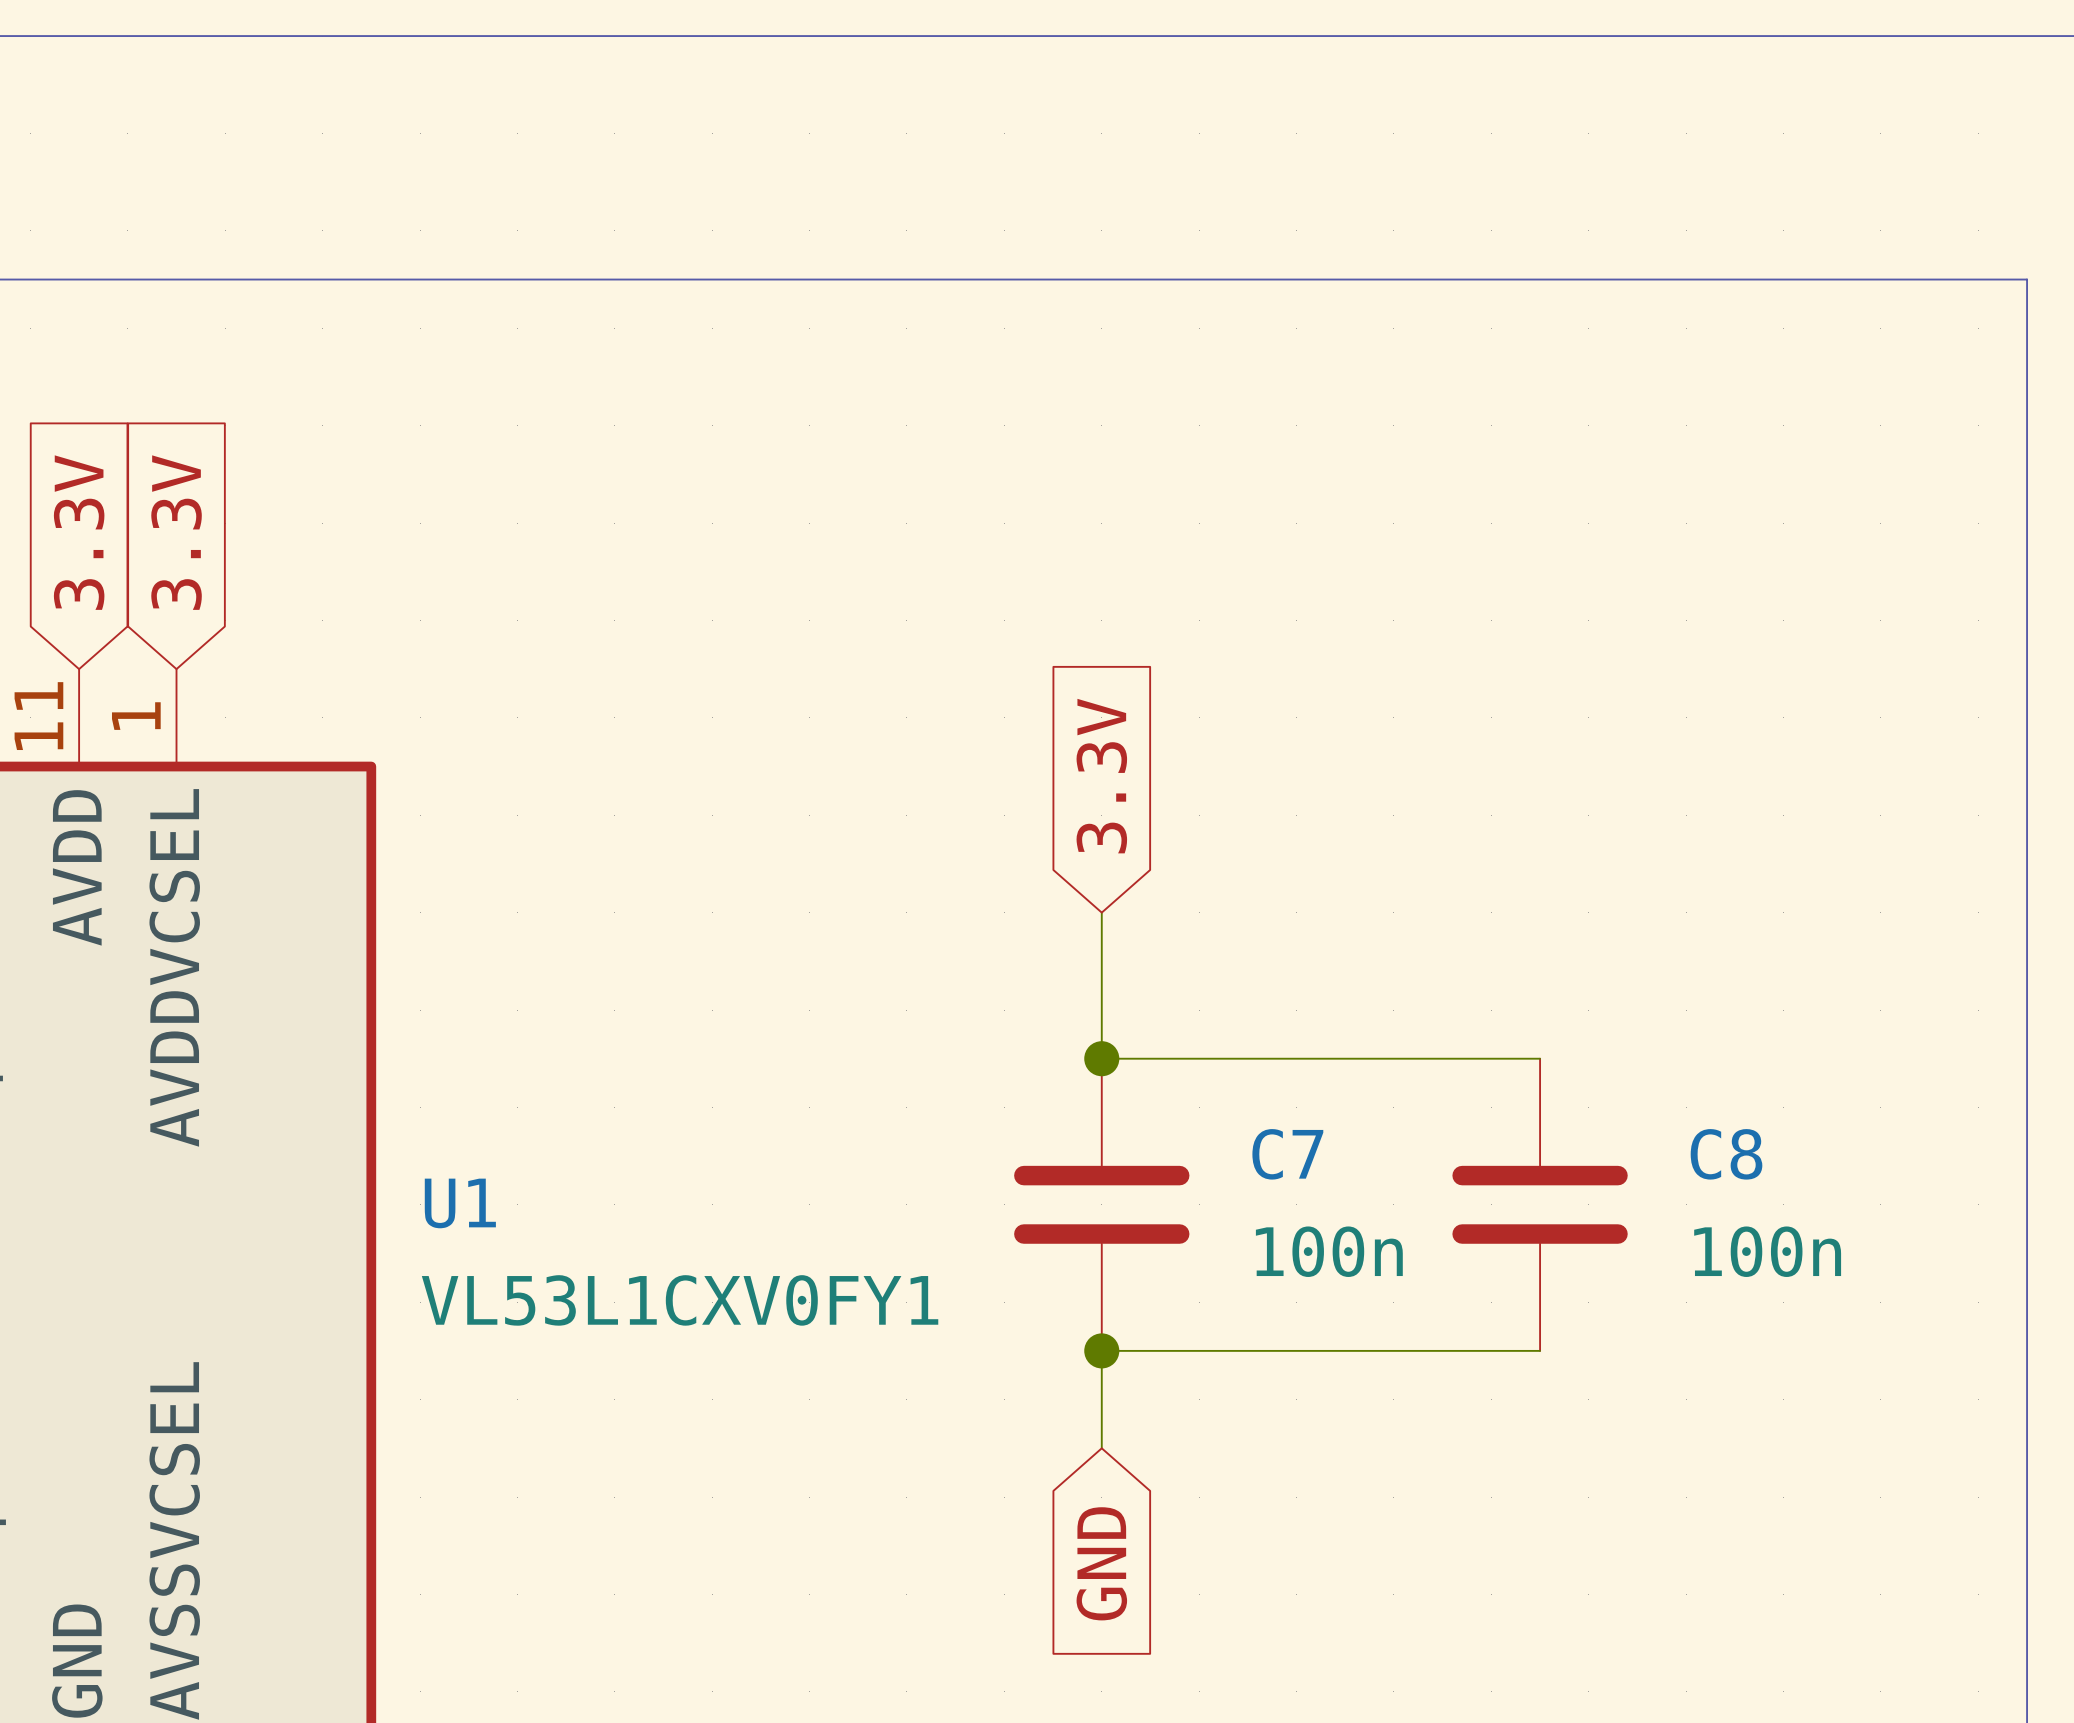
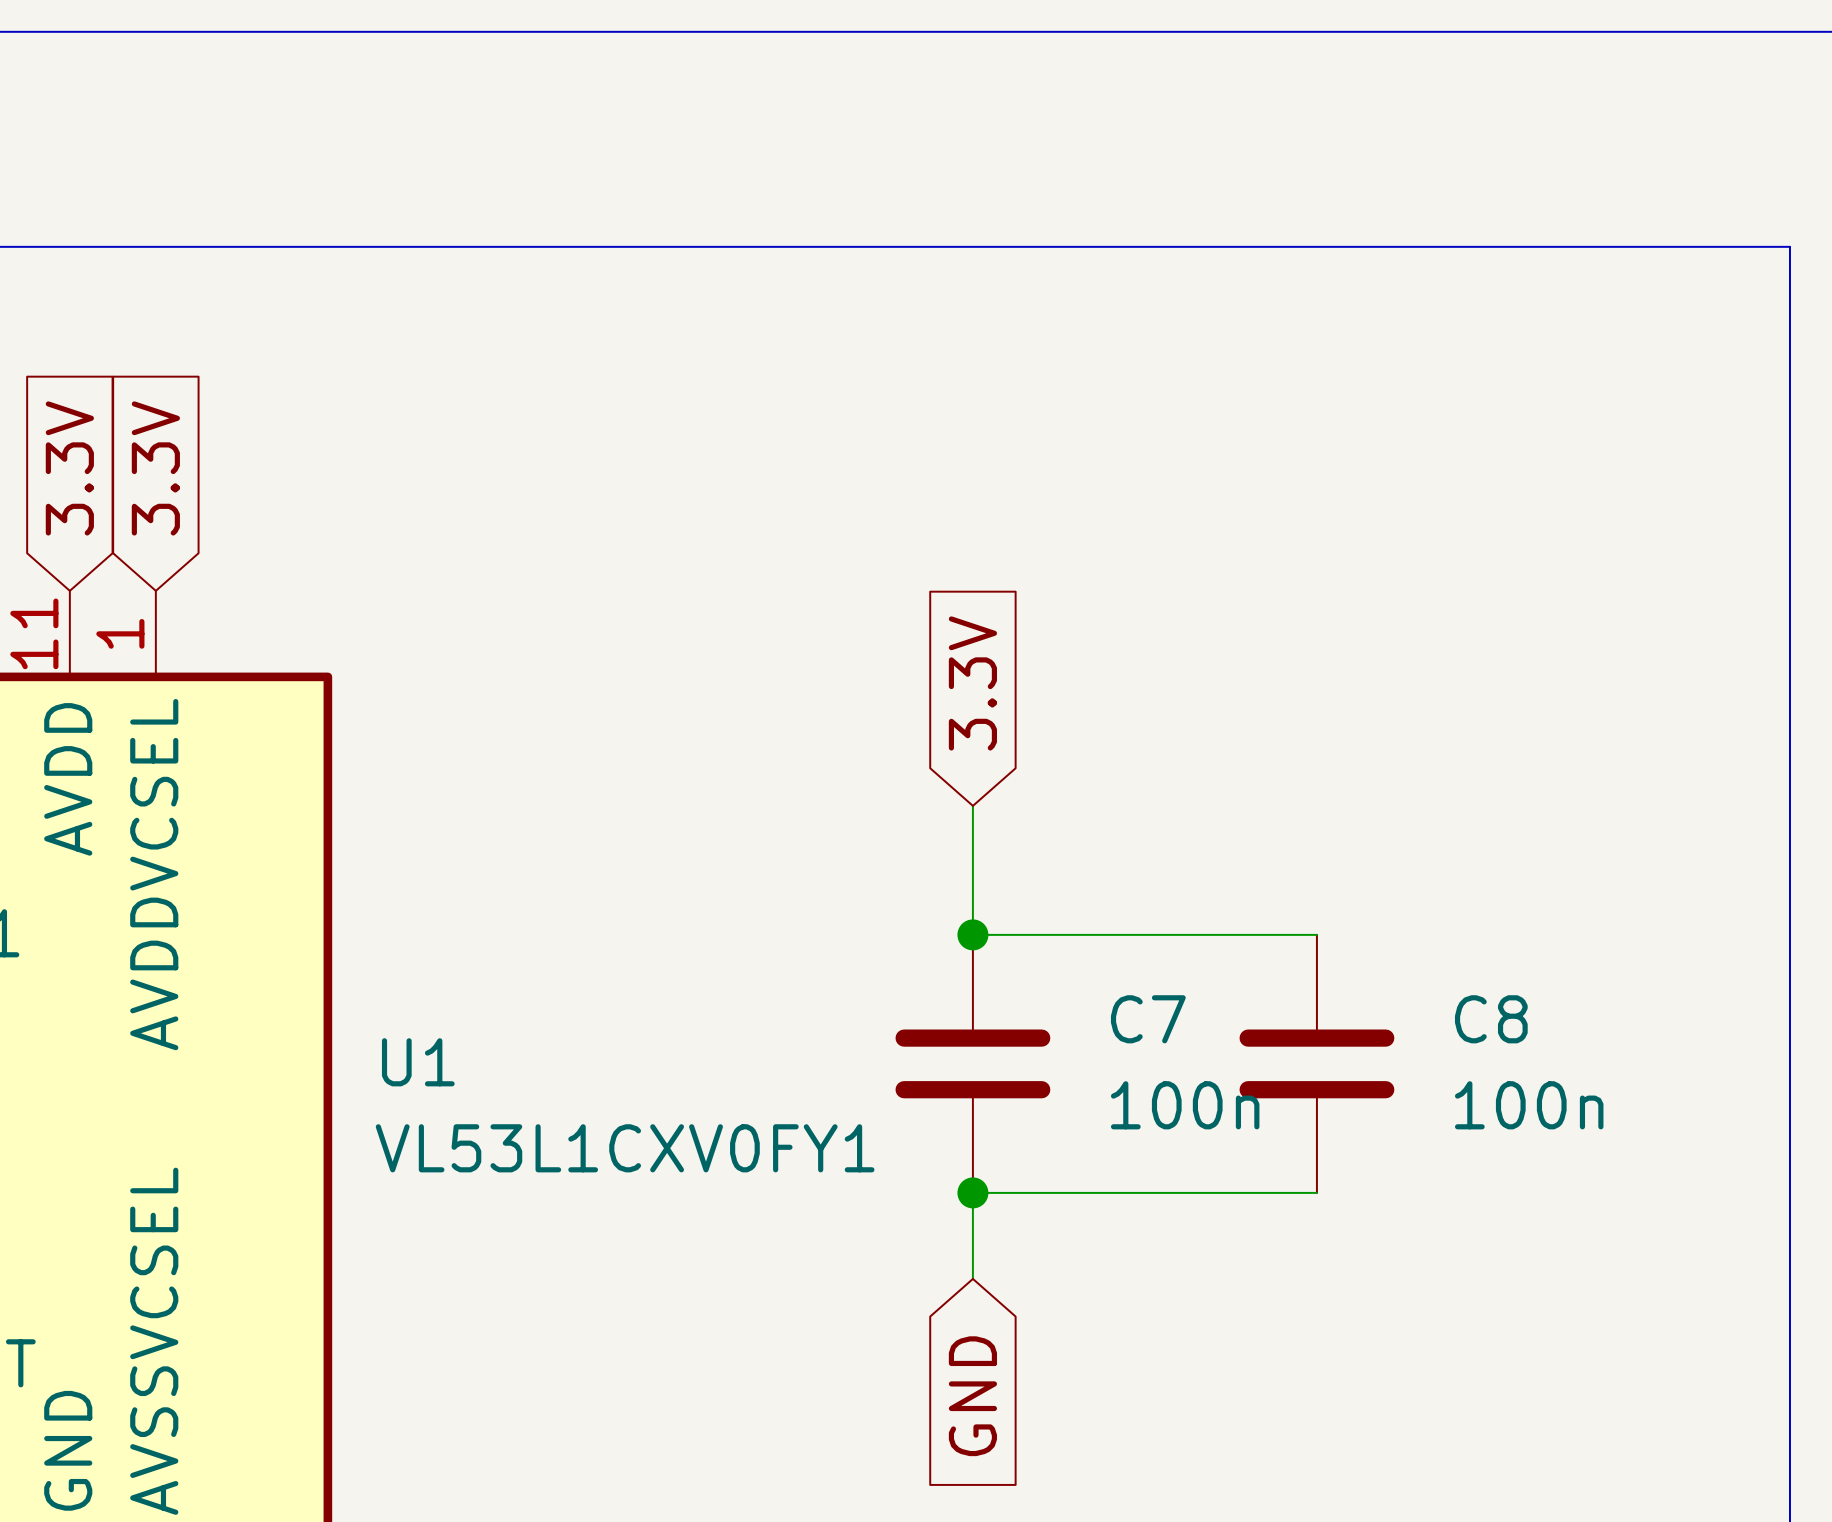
wire: (1491, 1058) (1540, 1058) -> none
C8 position: (1540, 1204) -> (1316, 1063)
wire: (1491, 1350) (1540, 1350) -> none

